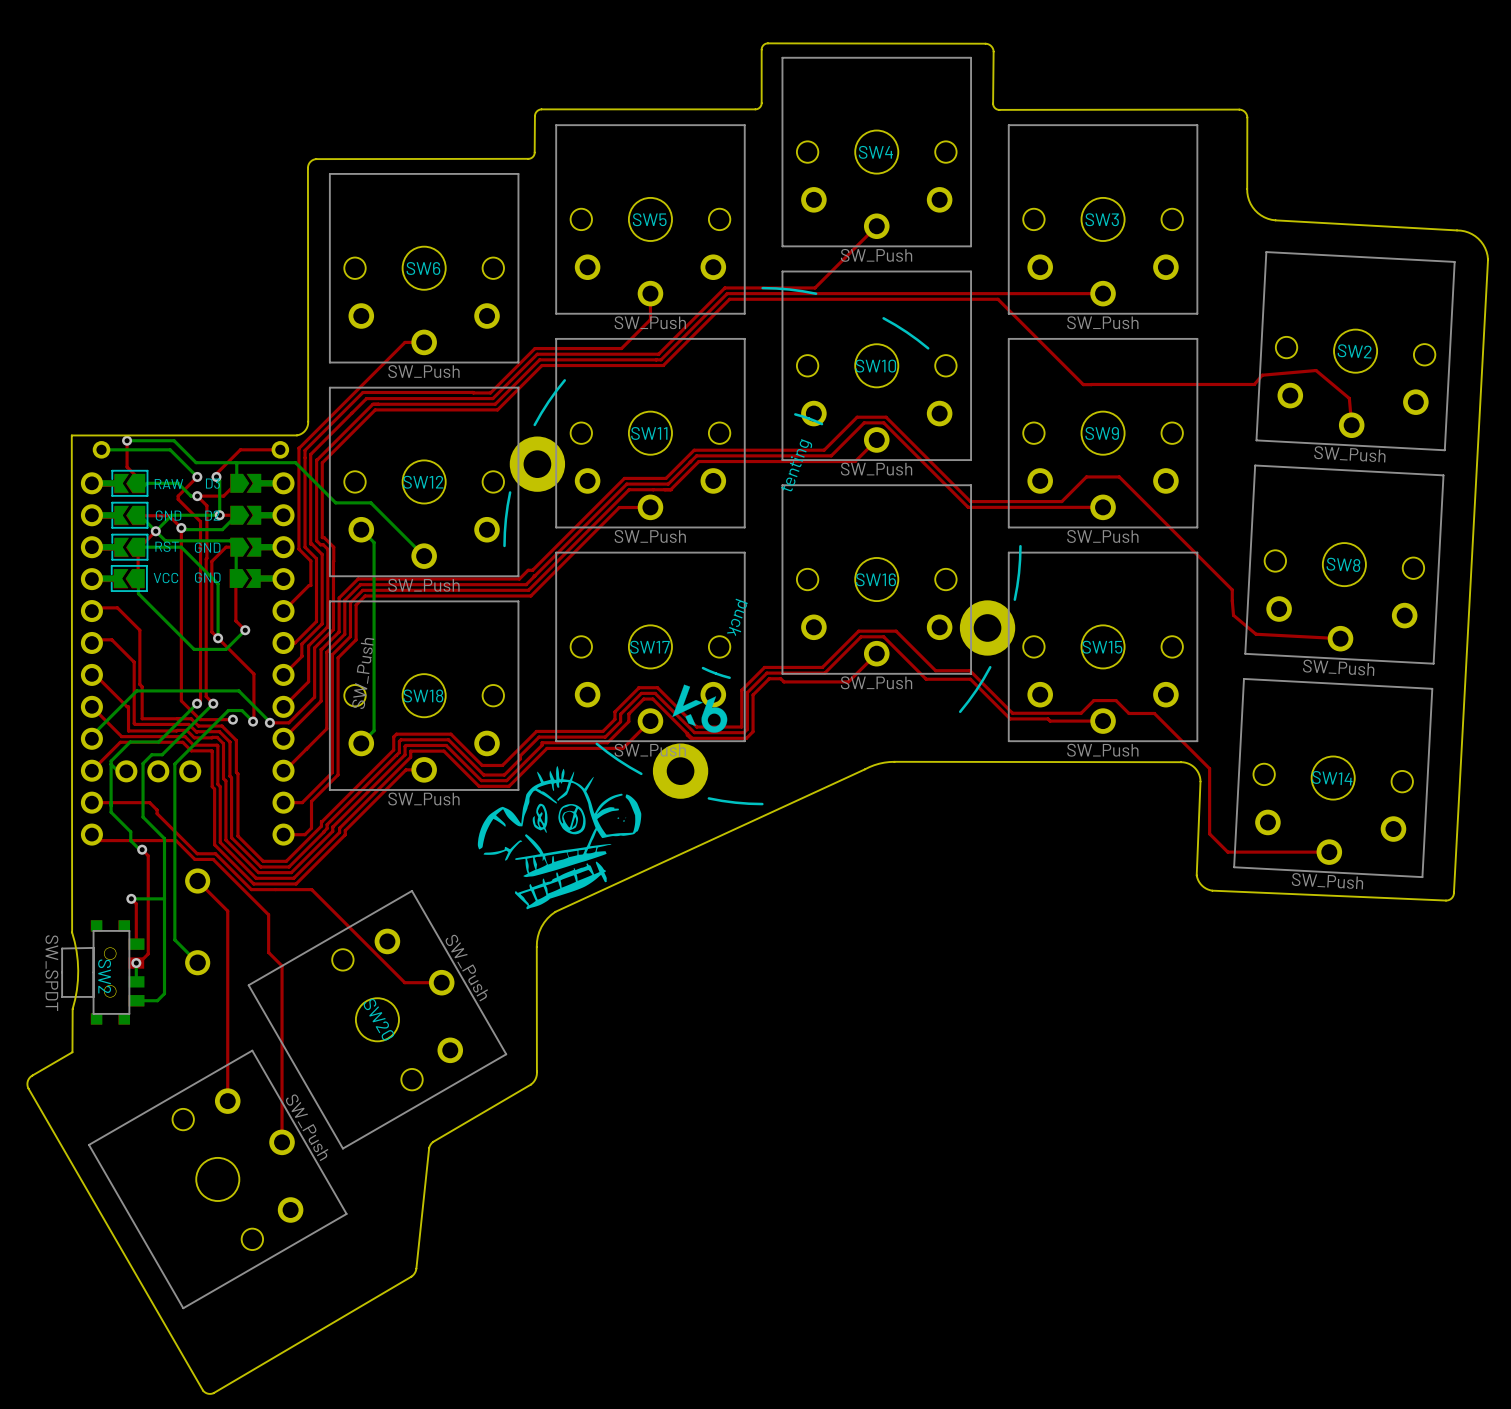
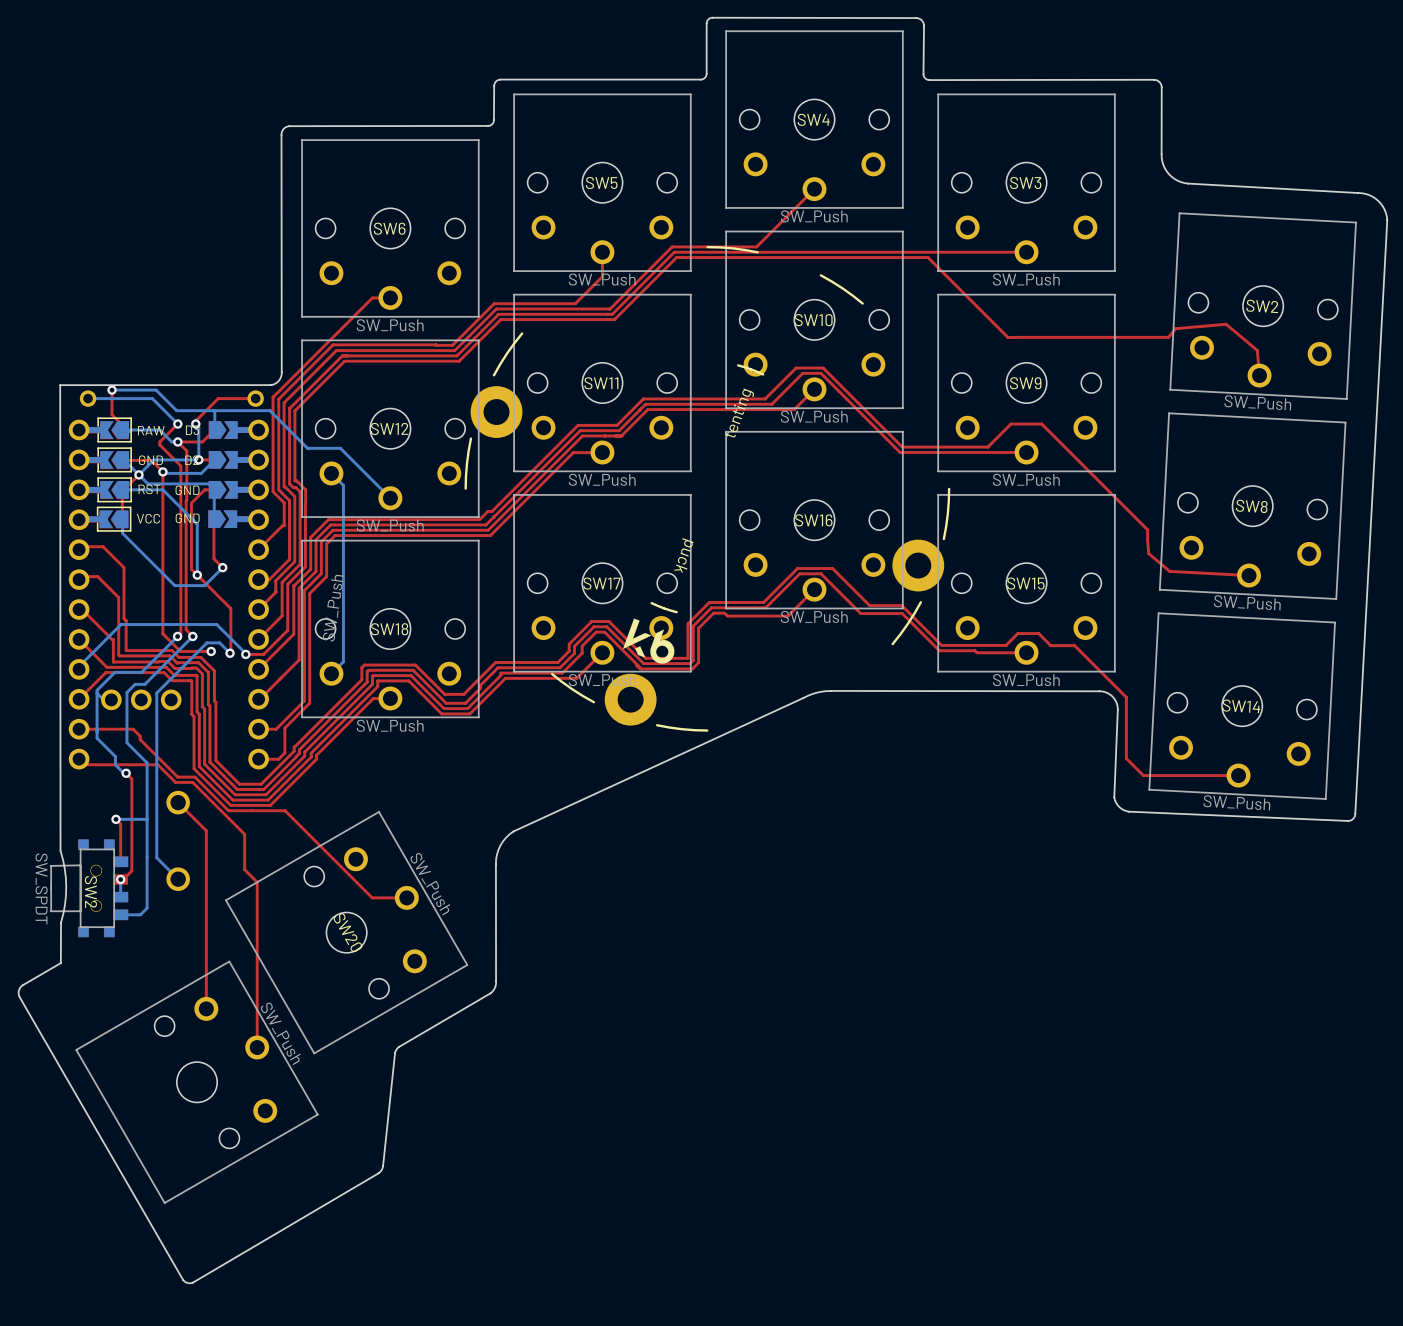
drawing: [477, 766, 642, 910] -> none

